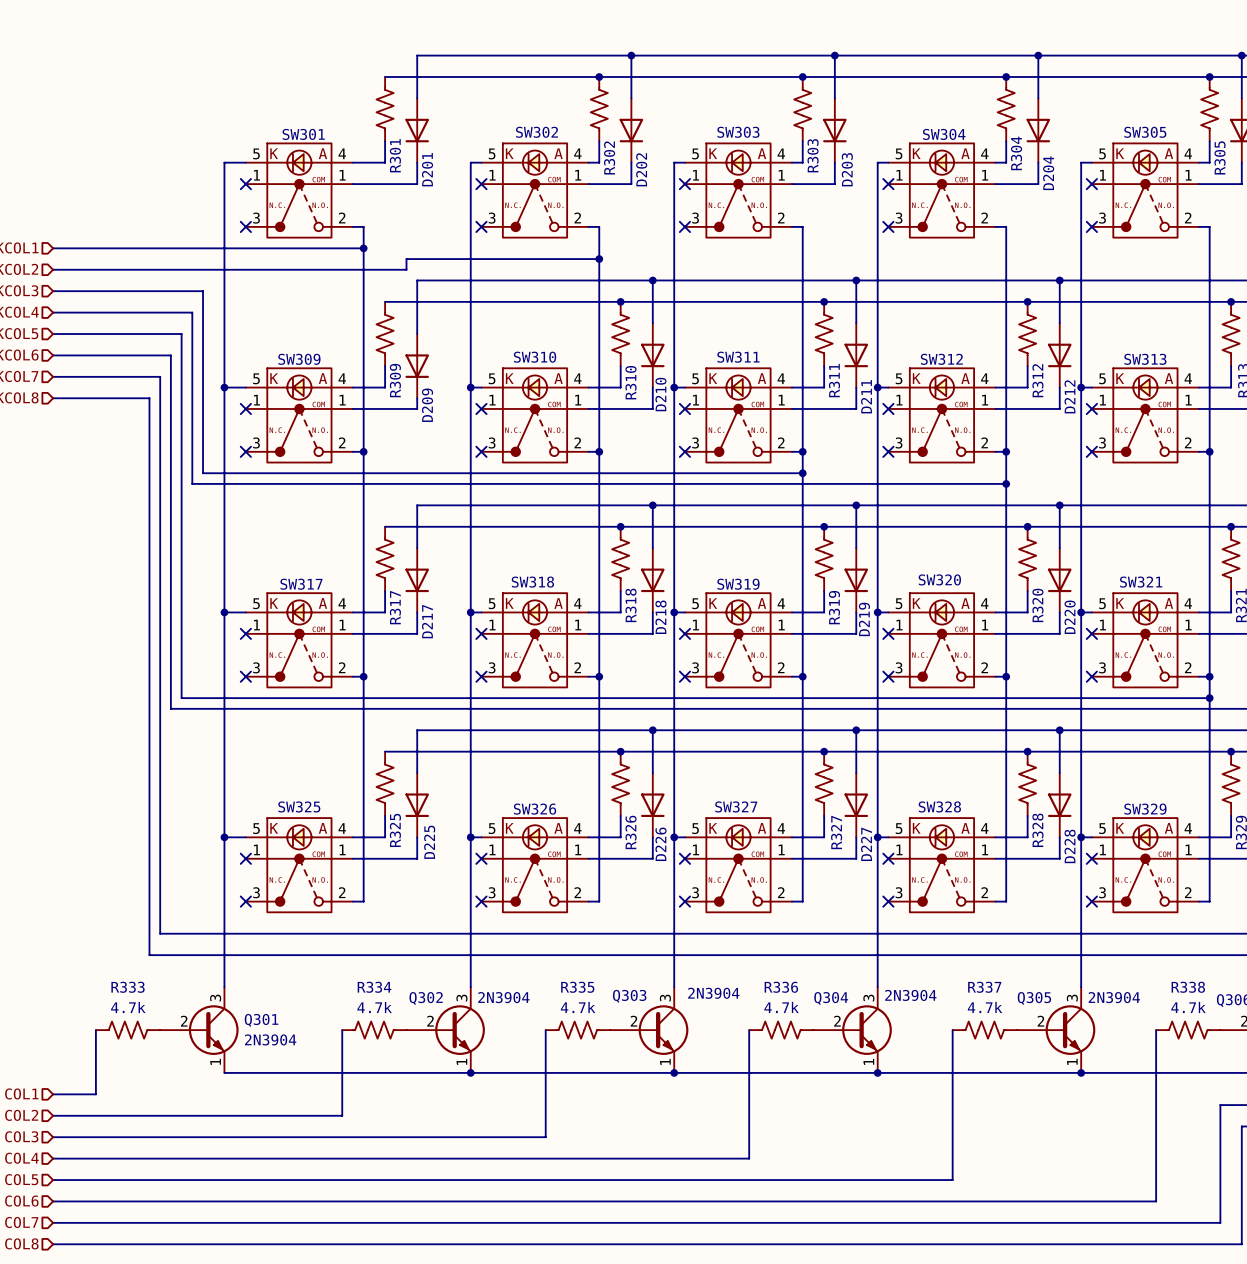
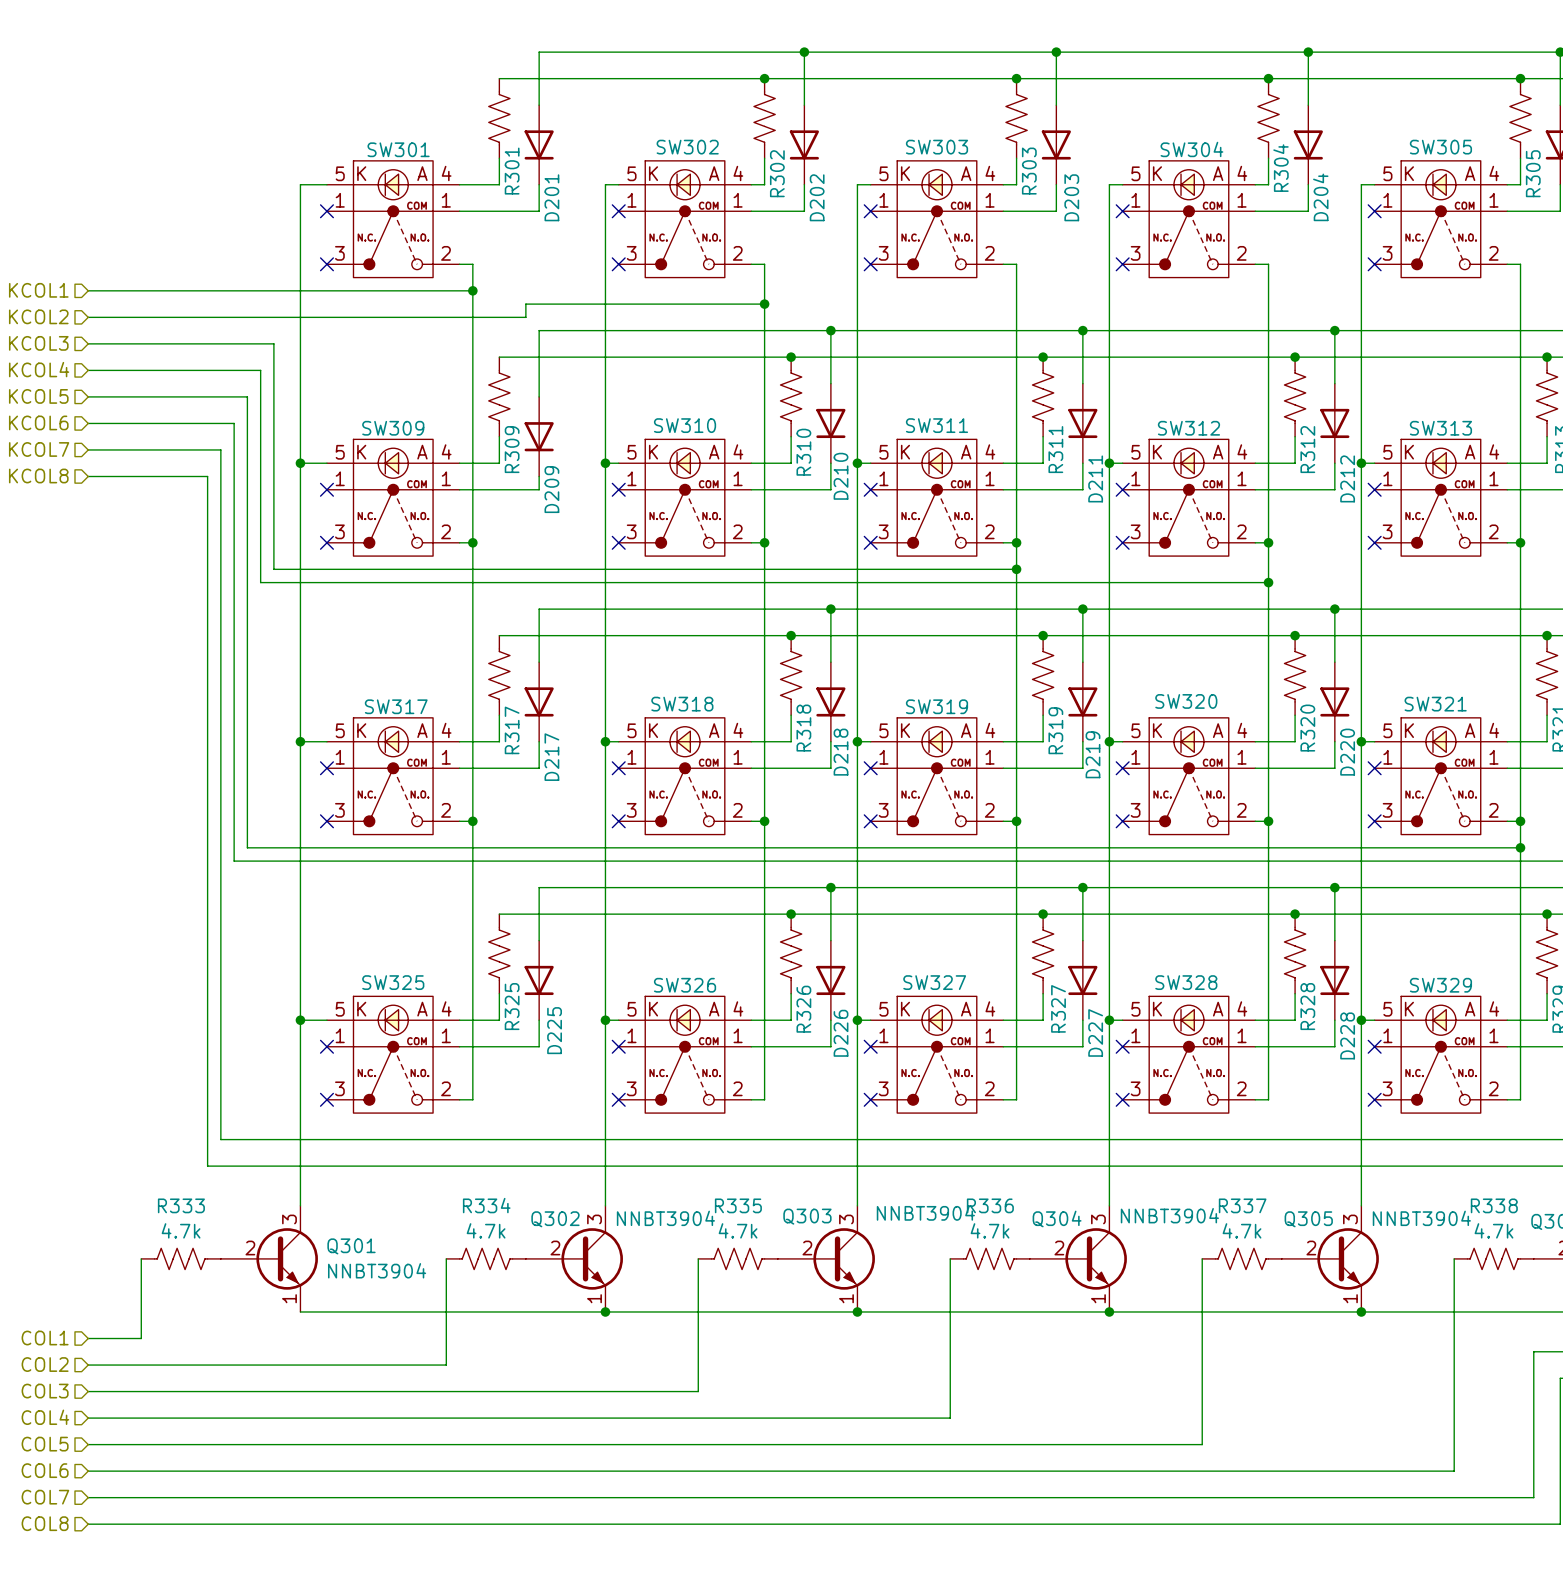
Q303 value: 2N3904 (713, 993) -> NNBT3904 (925, 1213)
Q304 value: 2N3904 (910, 995) -> NNBT3904 (1169, 1215)
Q302 value: 2N3904 (503, 997) -> NNBT3904 (665, 1218)
Q305 value: 2N3904 (1114, 997) -> NNBT3904 (1421, 1218)
Q301 value: 2N3904 (270, 1039) -> NNBT3904 (377, 1270)

